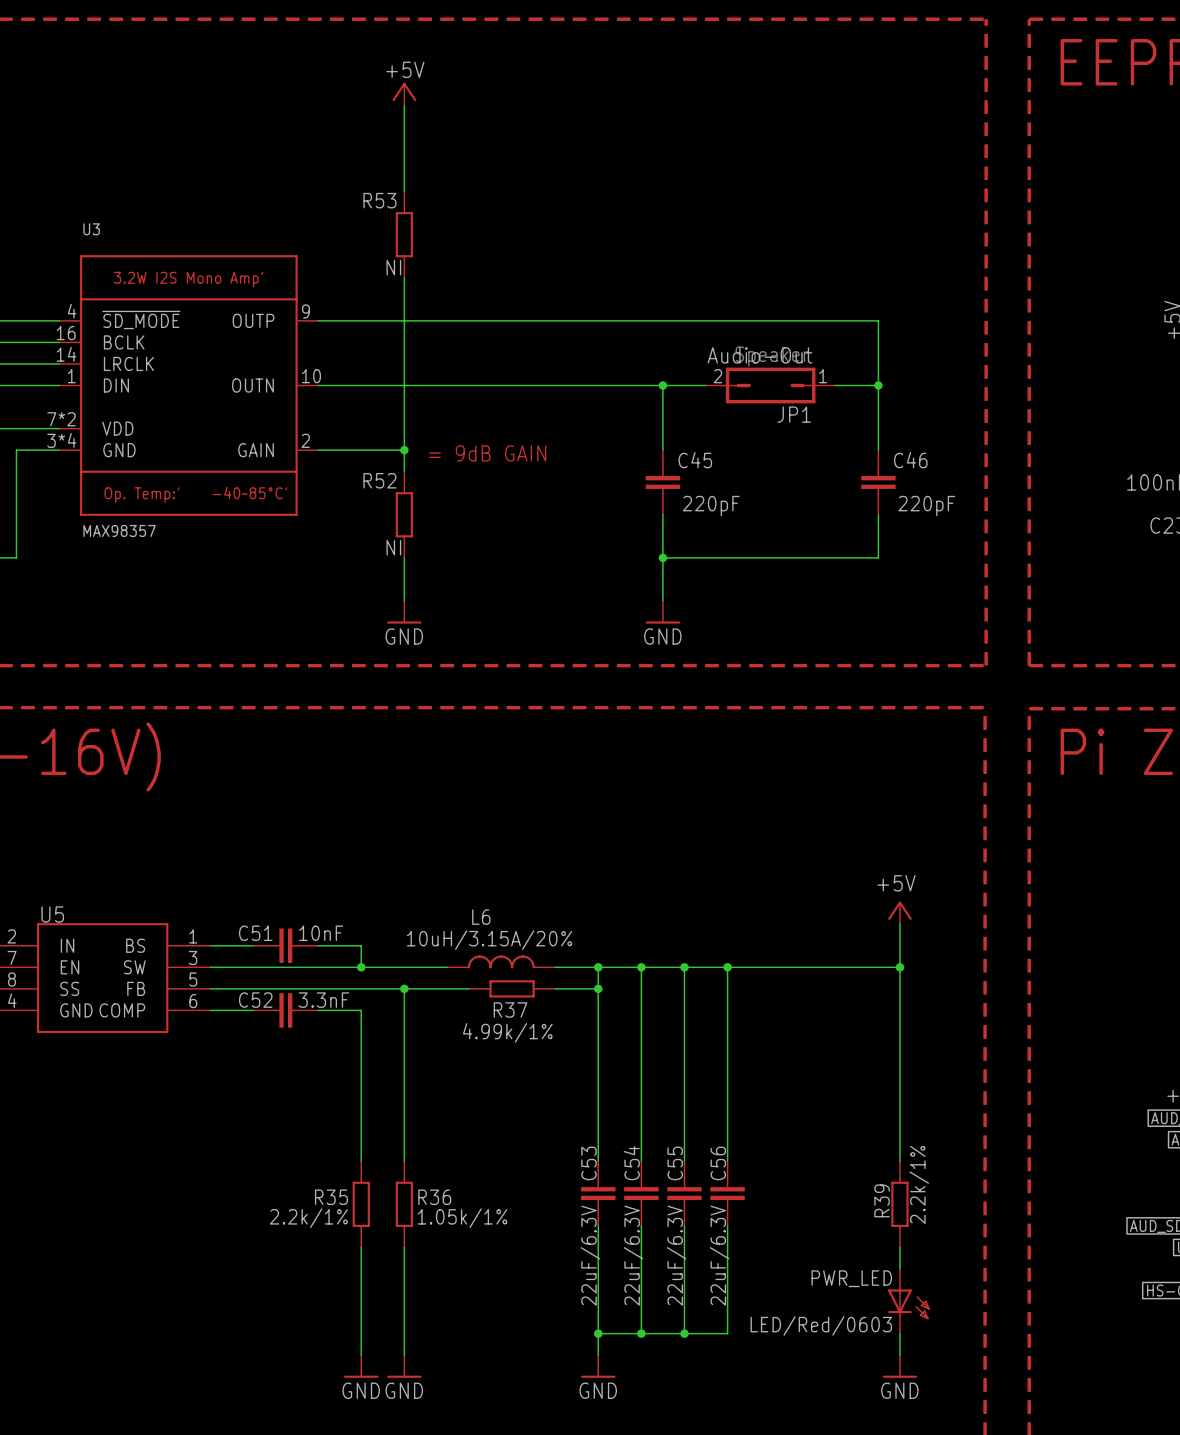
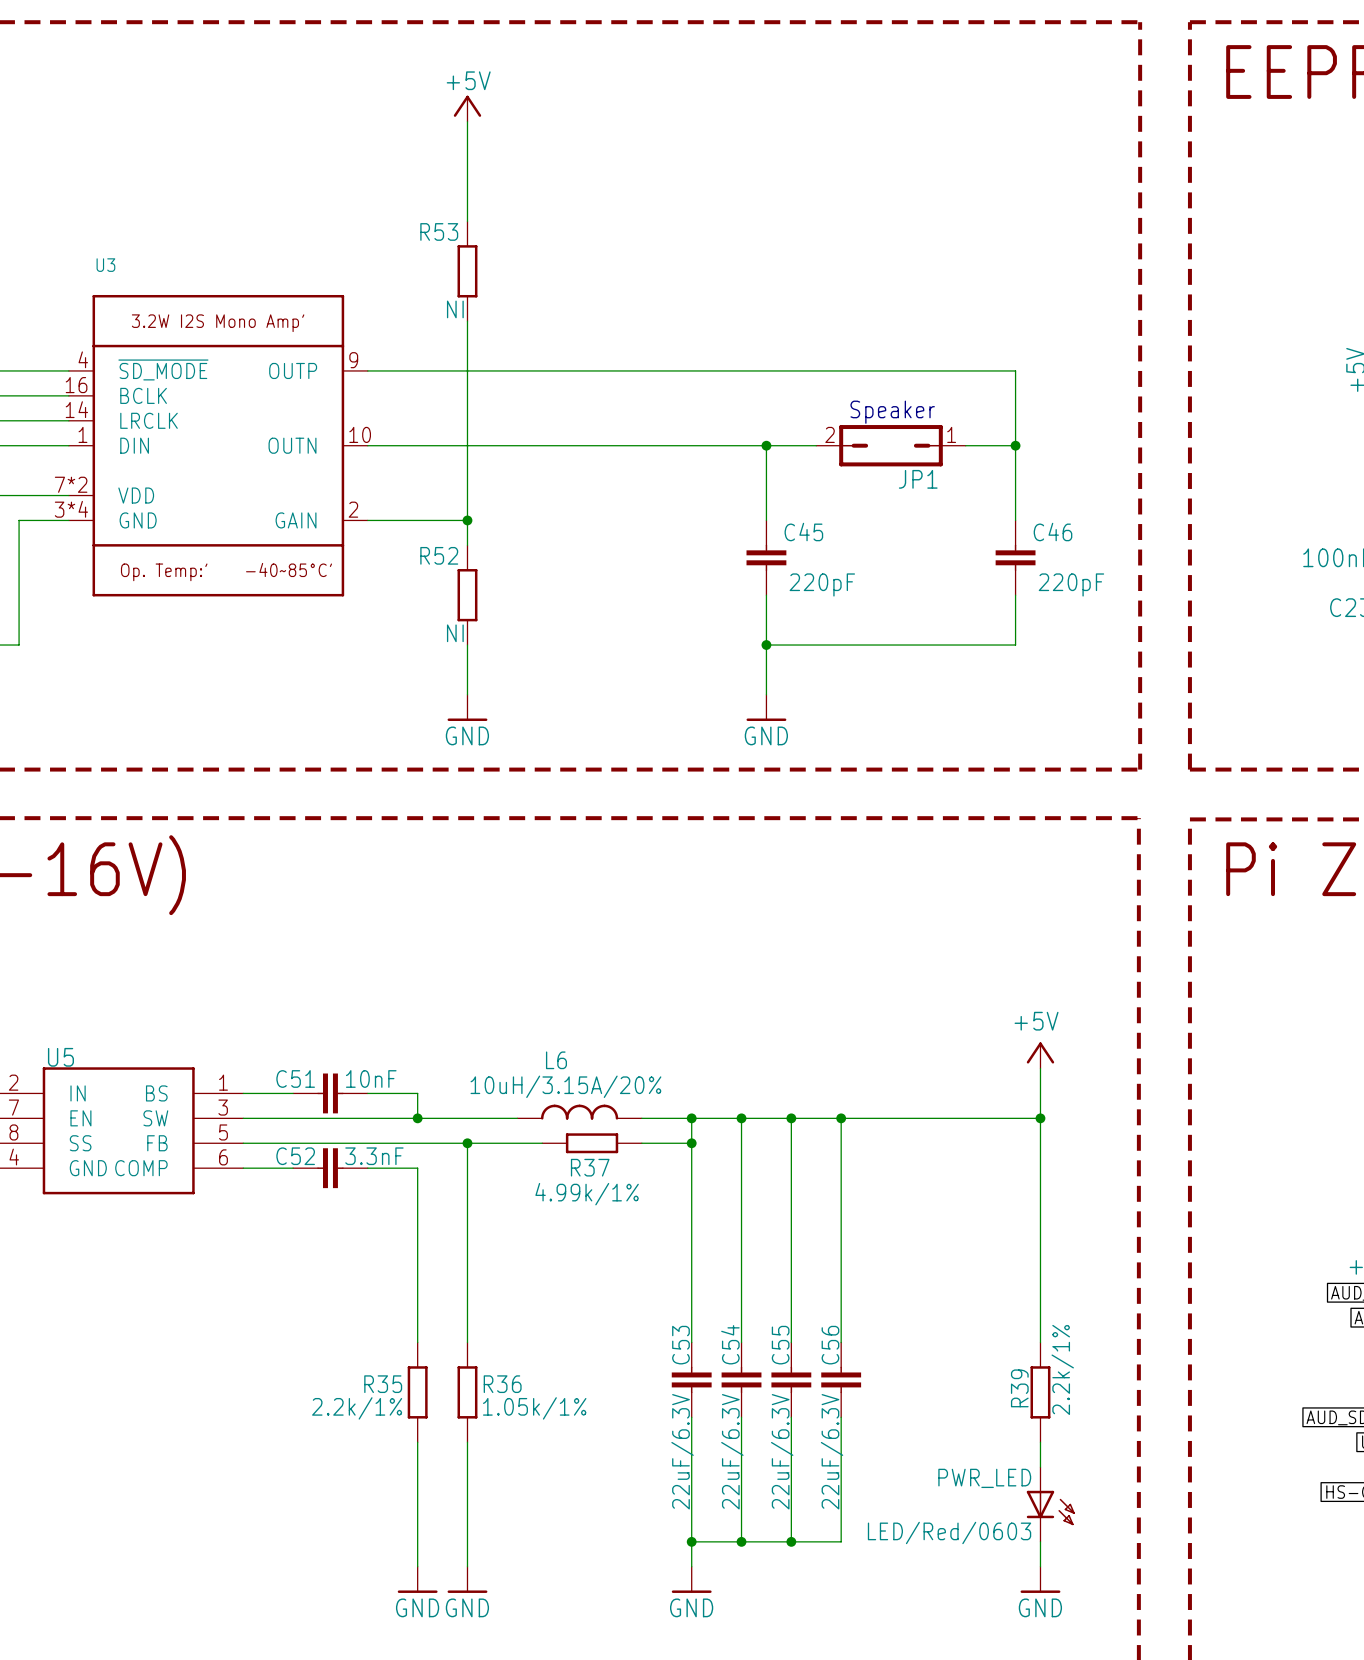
JP1 value: Audio-Out (759, 355) -> none
text: = 9dB GAIN (487, 453) -> none
U3 value: MAX98357 (119, 530) -> none

